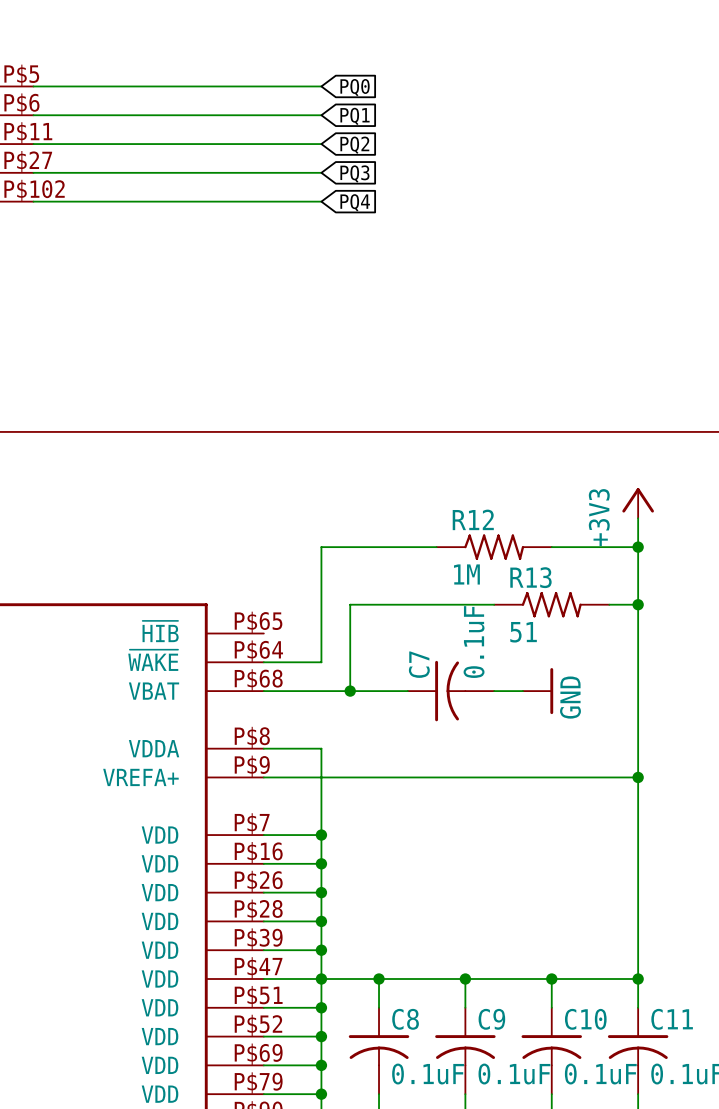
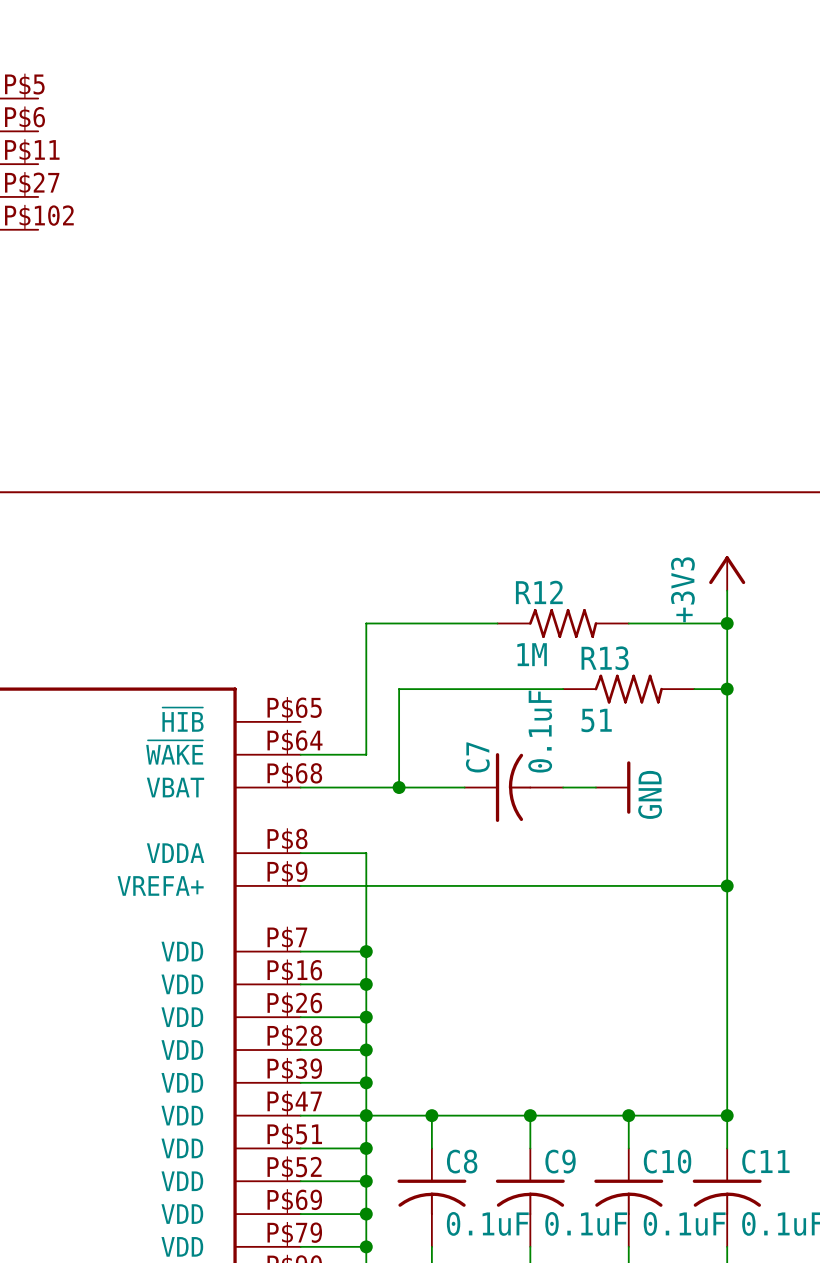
wire: (33, 86) (321, 86) -> none
global label: PQ0 (355, 87) -> none
wire: (33, 115) (321, 115) -> none
global label: PQ1 (355, 116) -> none
wire: (33, 144) (321, 144) -> none
global label: PQ2 (354, 145) -> none
wire: (33, 172) (321, 172) -> none
global label: PQ3 (354, 174) -> none
wire: (33, 201) (321, 201) -> none
global label: PQ4 (355, 202) -> none

